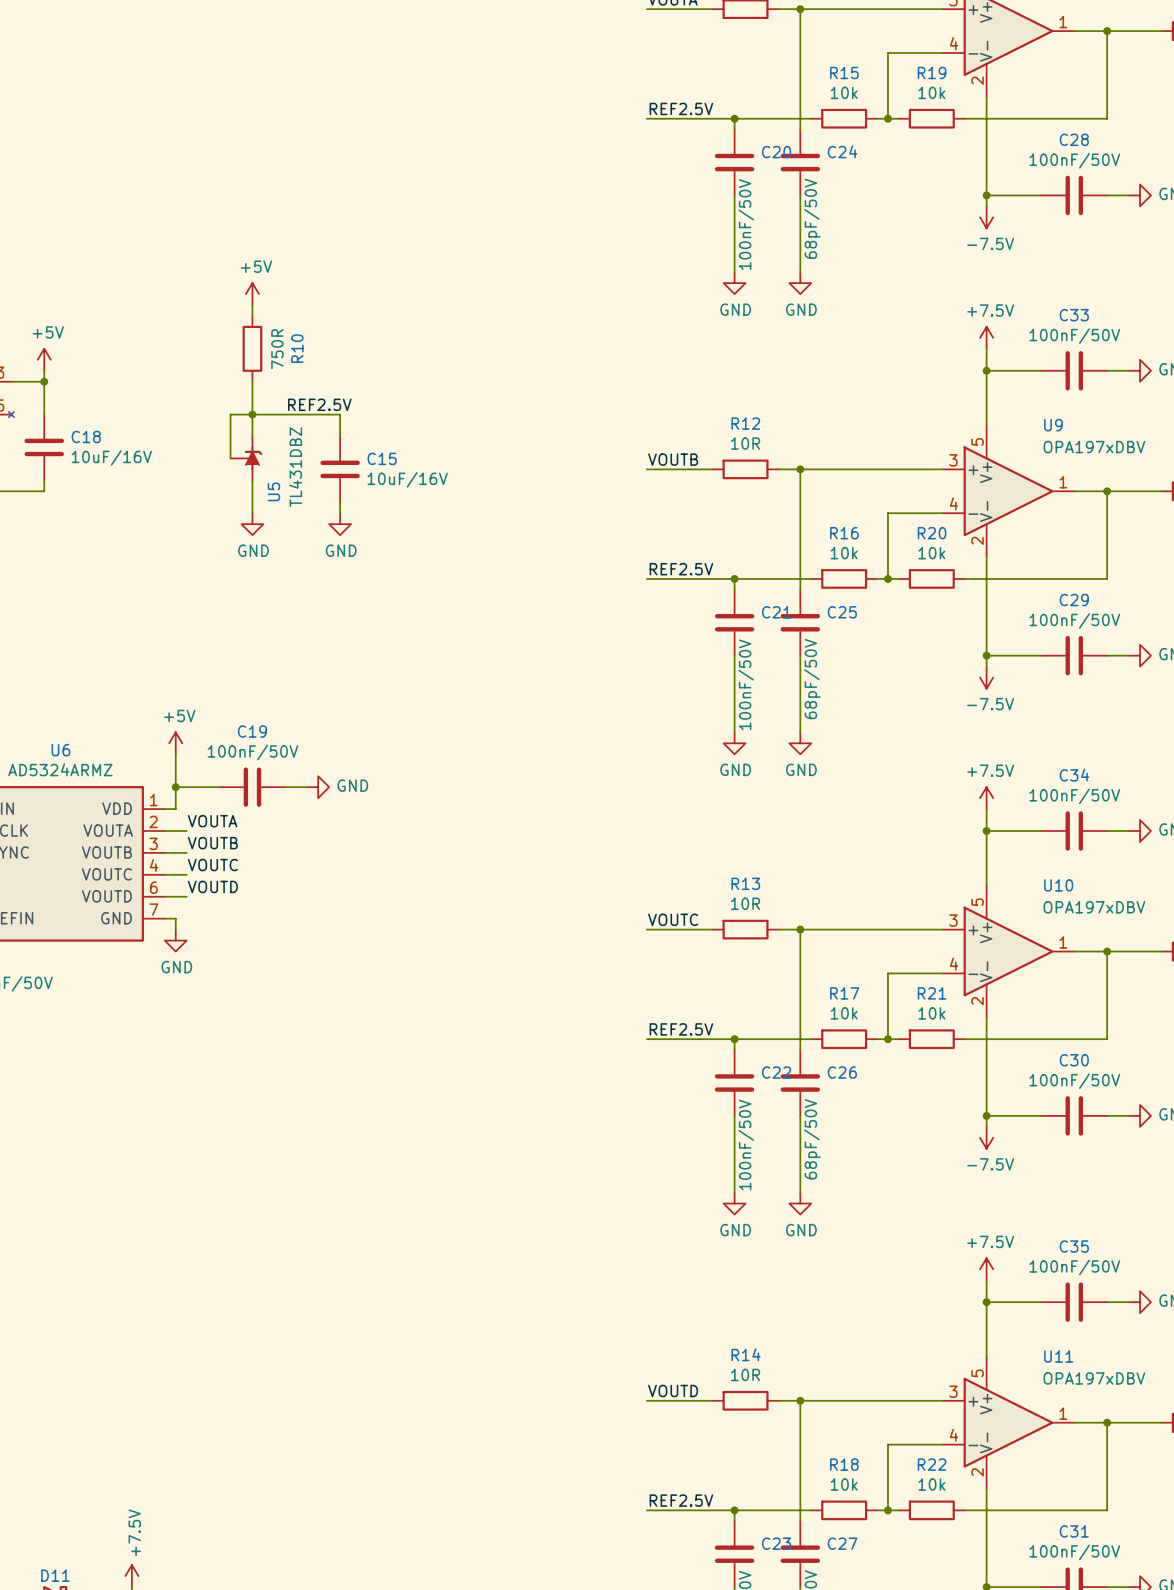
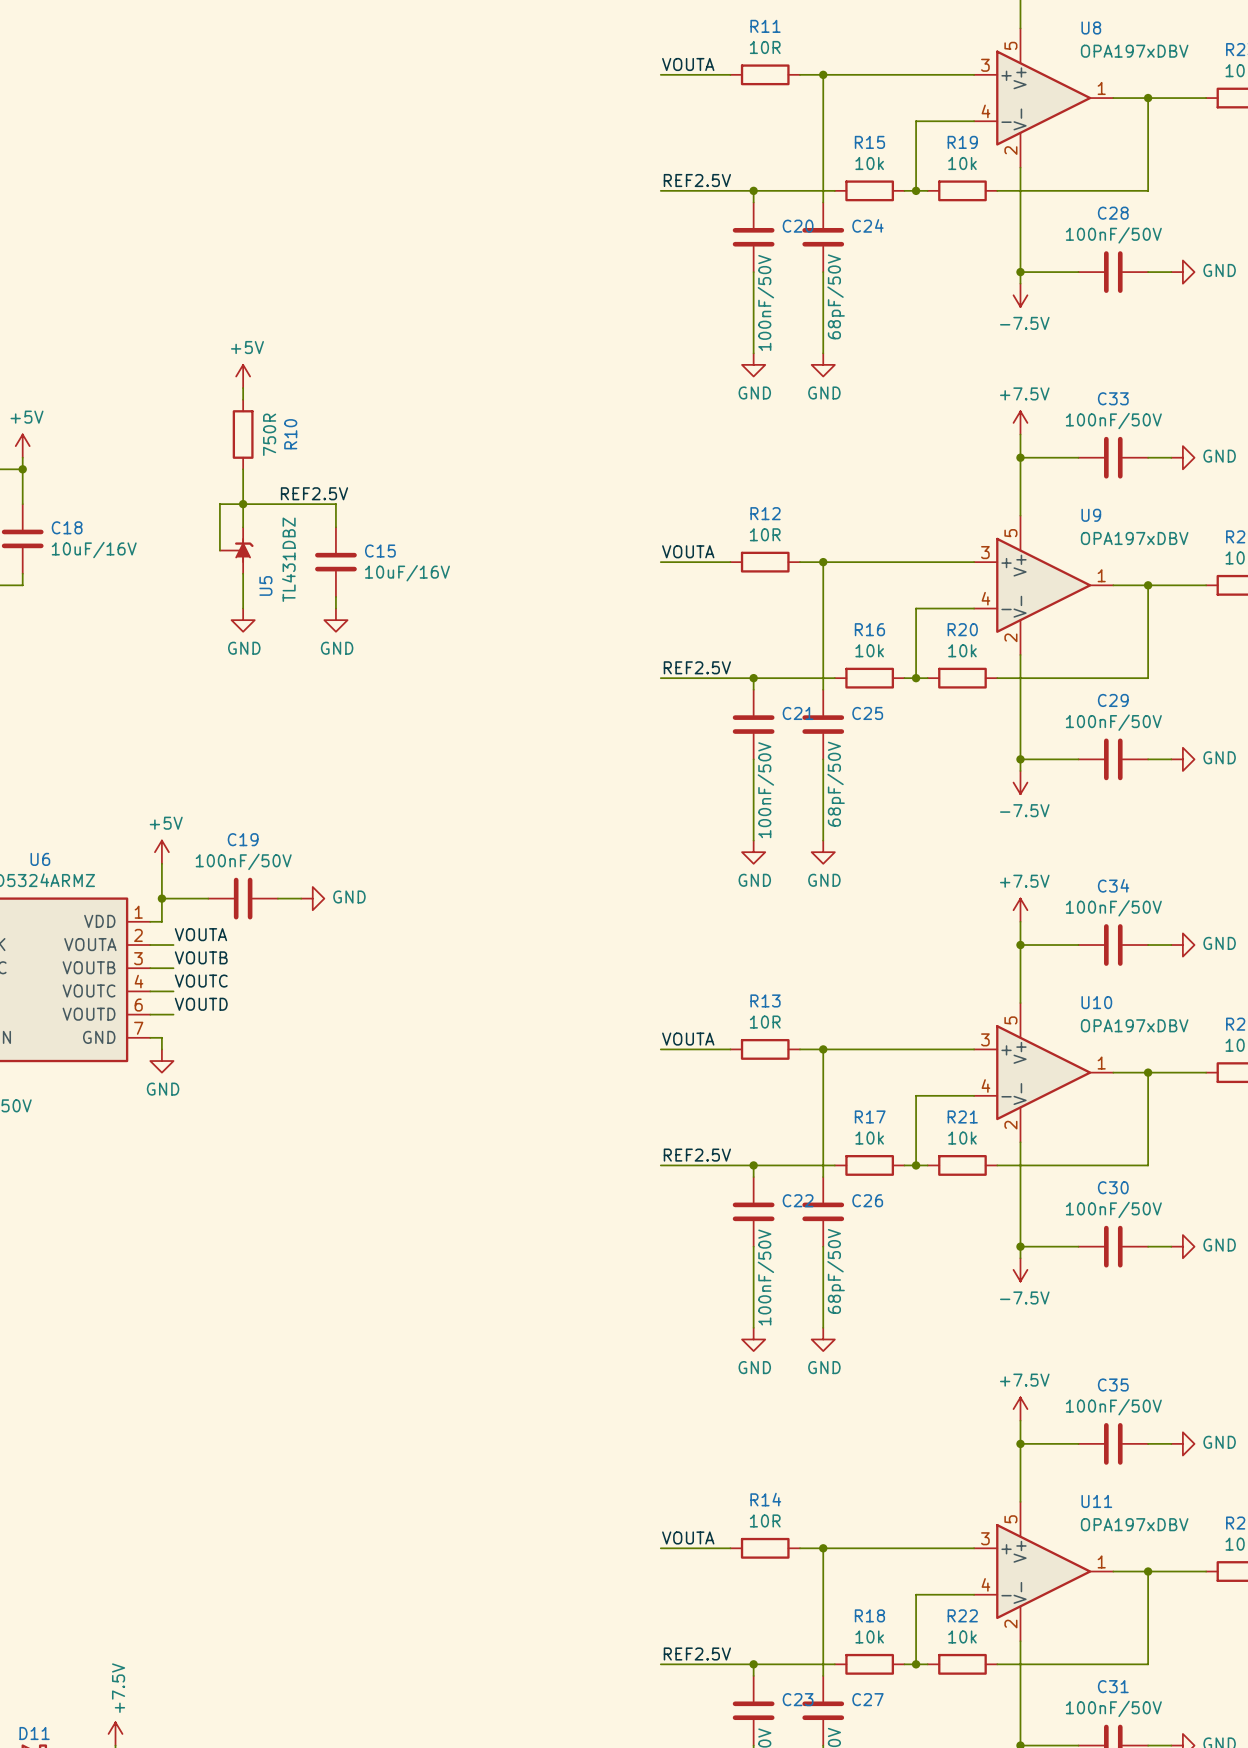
label: VOUTB (673, 459) -> VOUTA (688, 551)
label: VOUTC (673, 919) -> VOUTA (688, 1039)
label: VOUTD (673, 1391) -> VOUTA (688, 1537)

